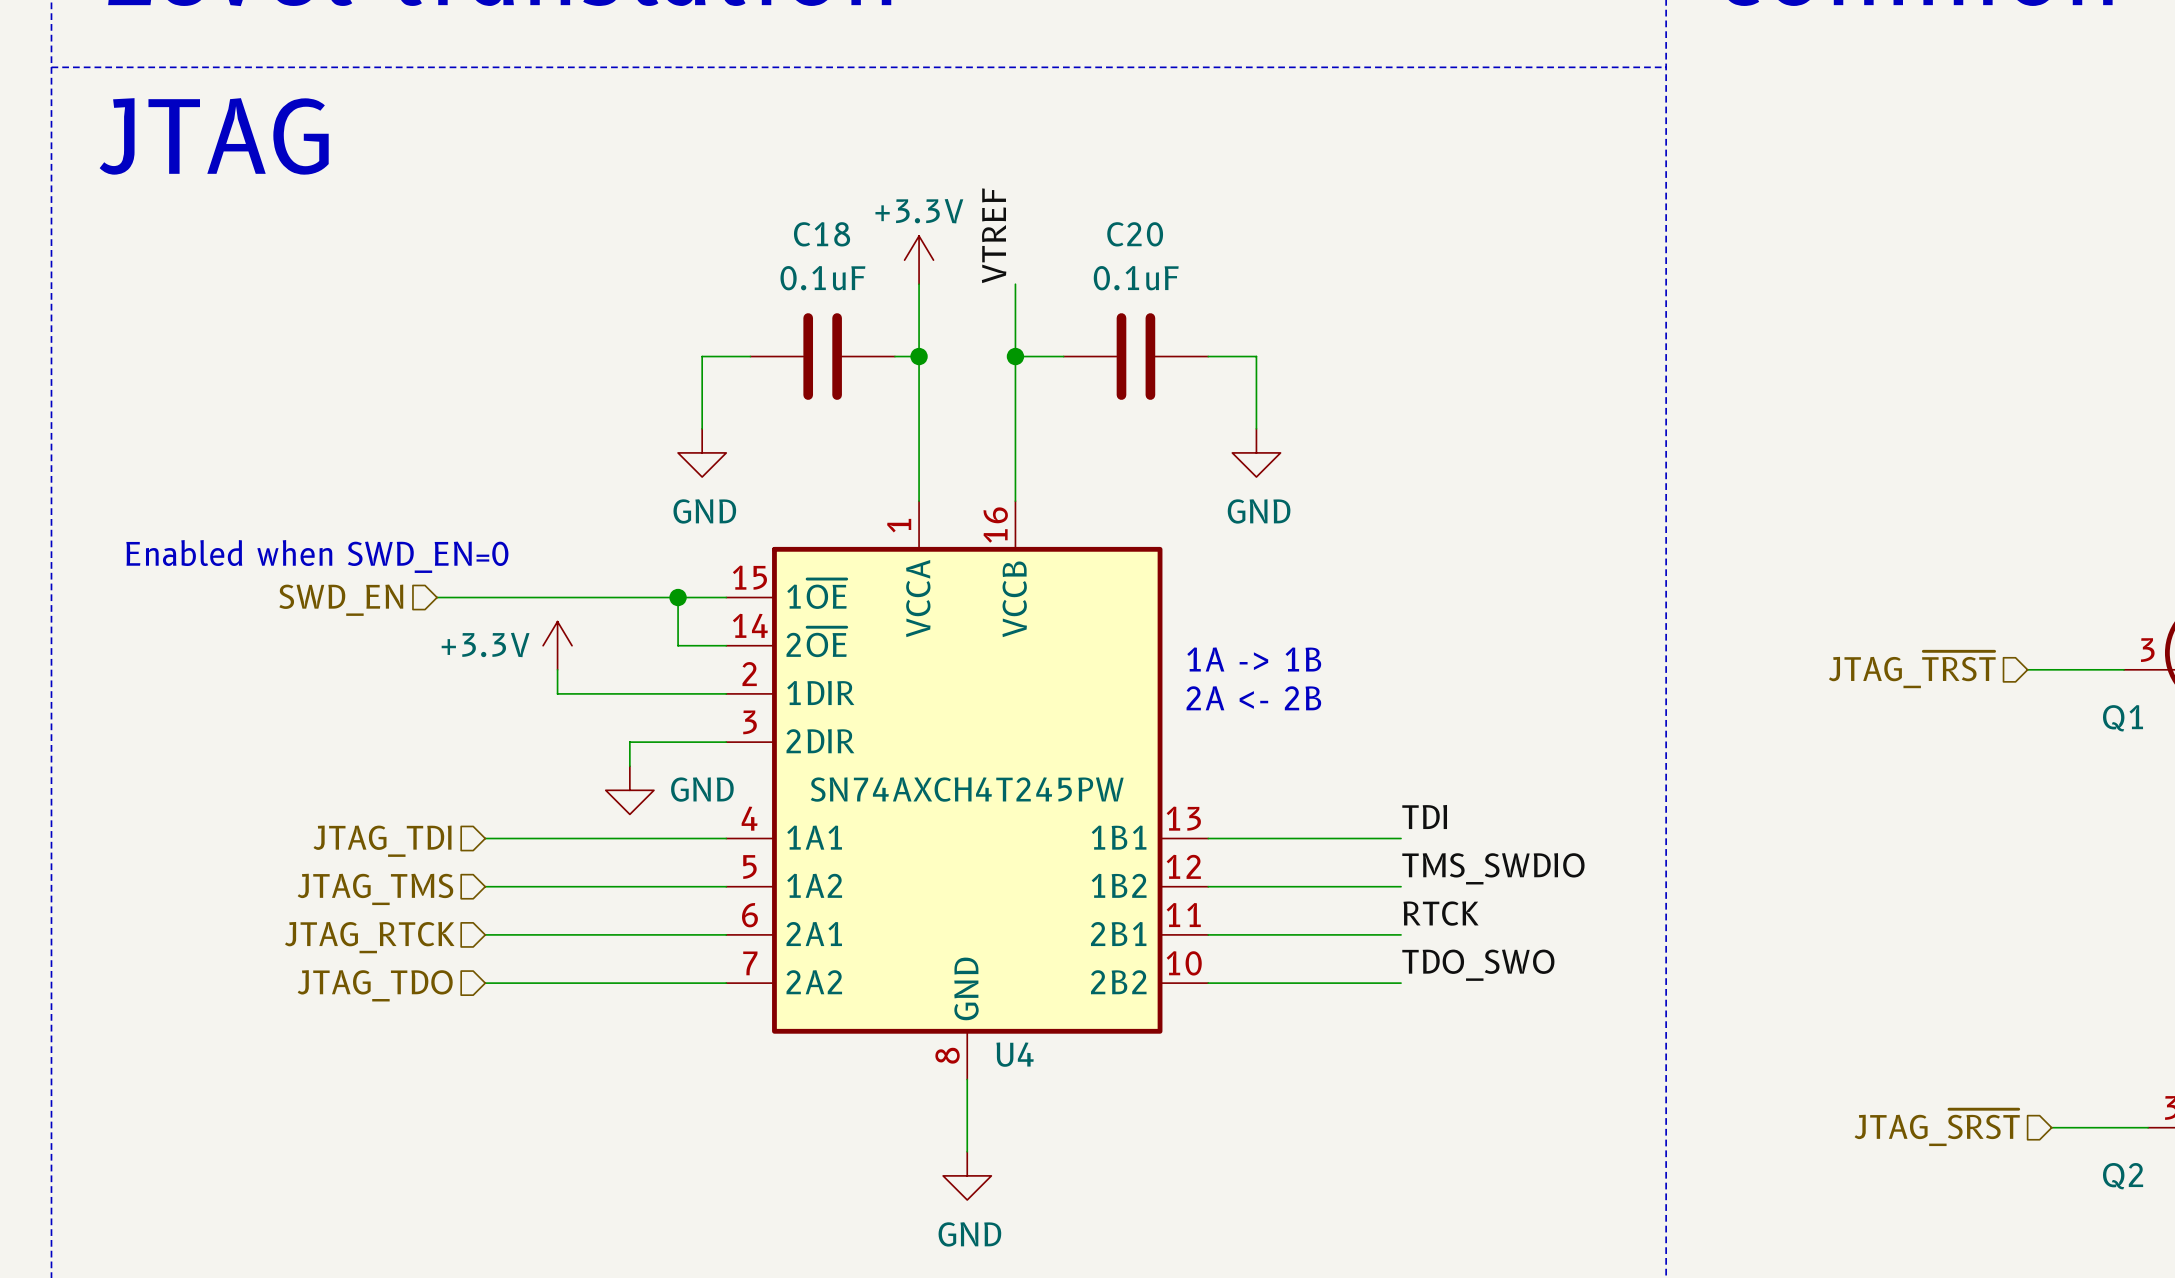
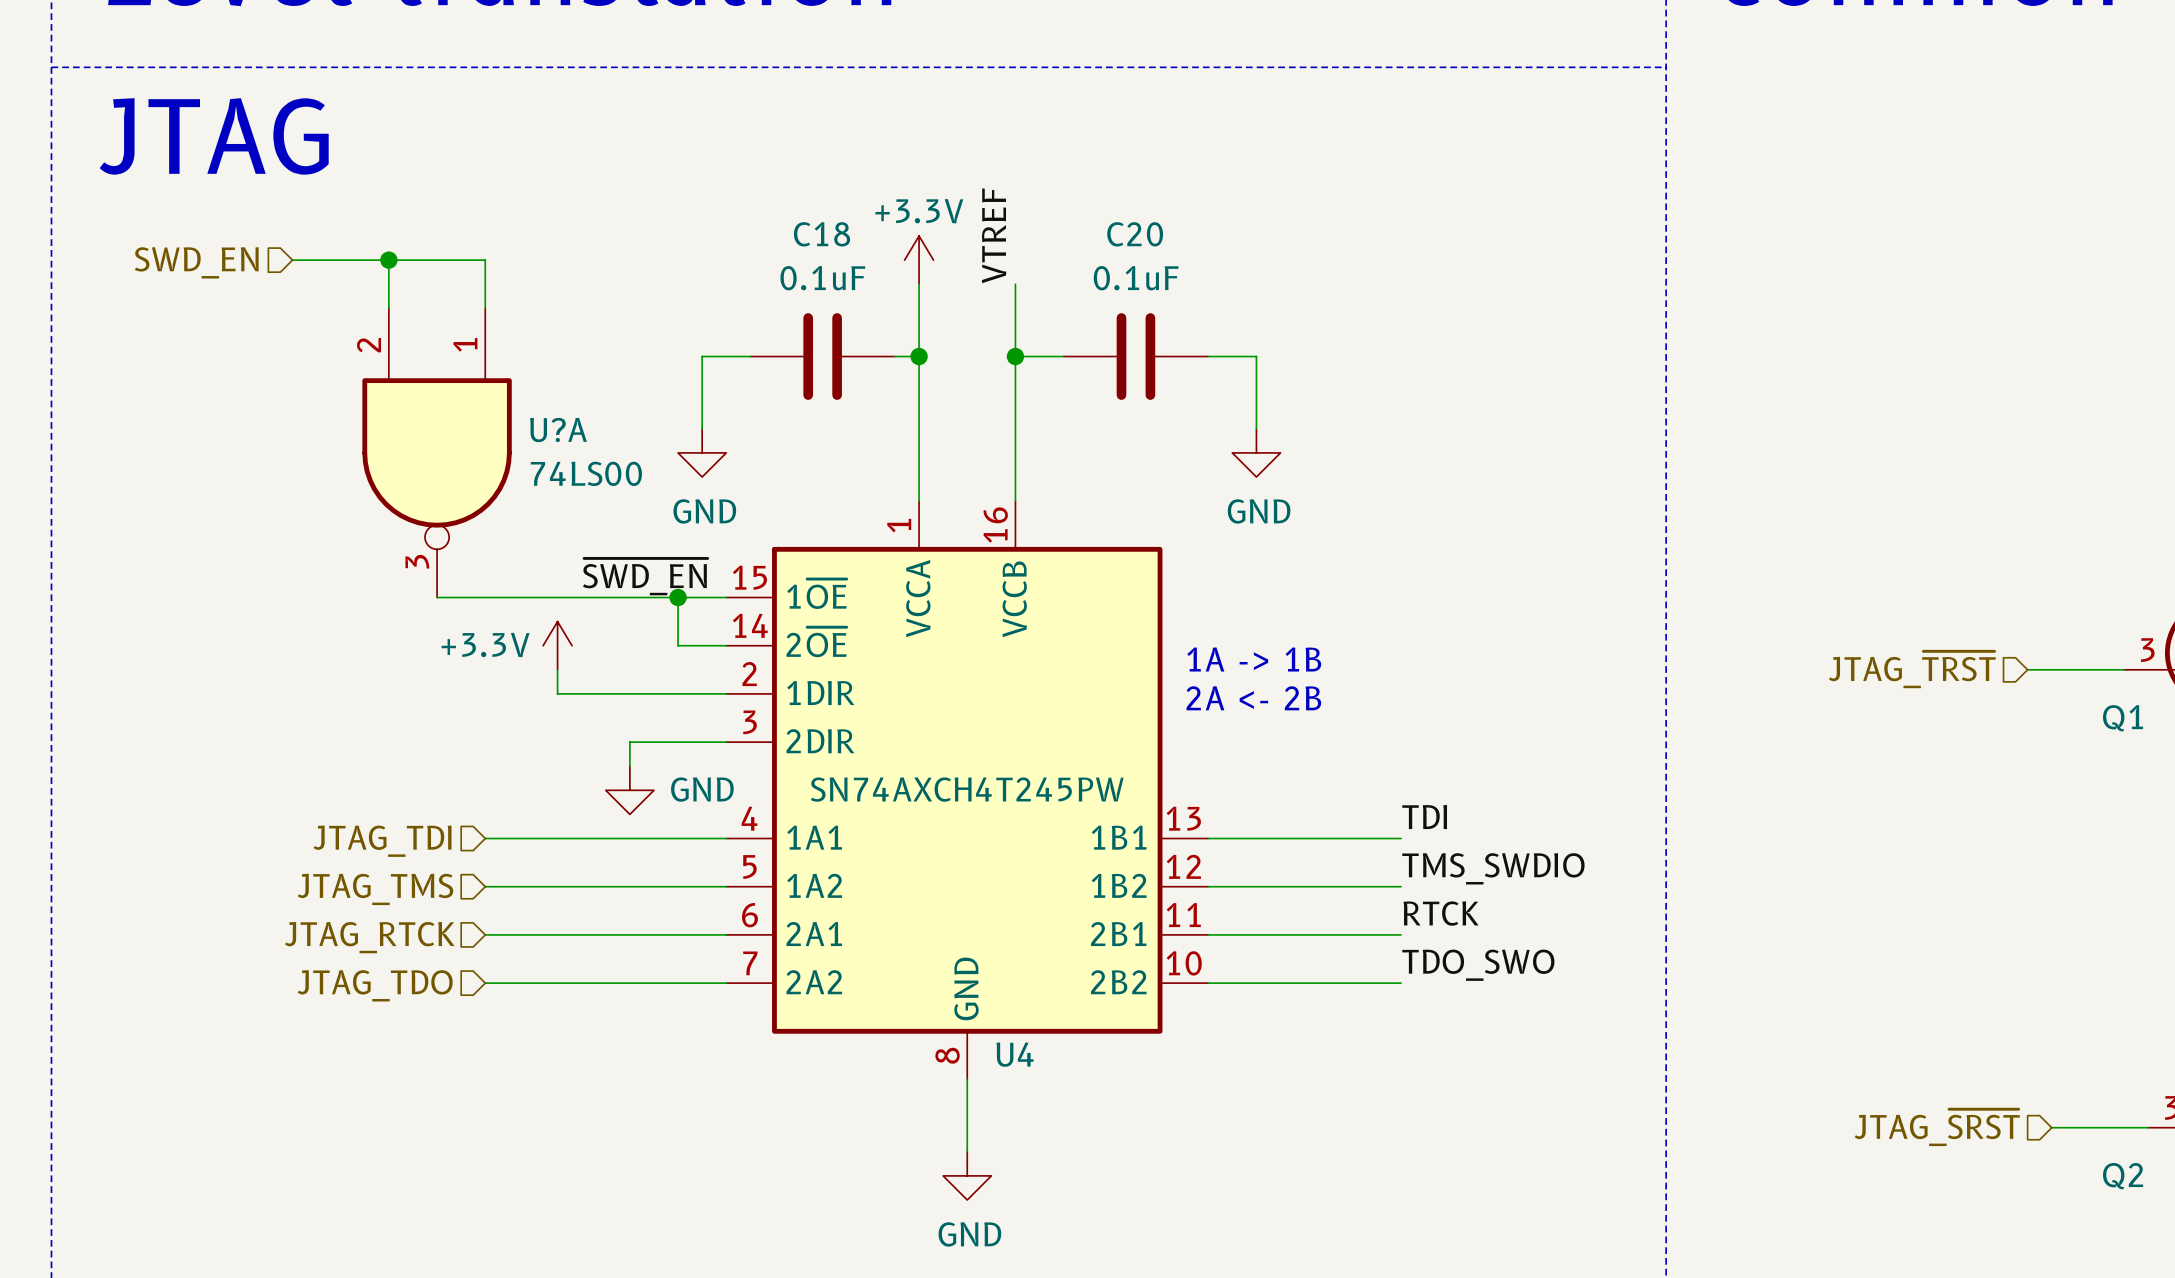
wire: none -> (292, 260) (485, 260) (485, 308)
wire: none -> (388, 260) (388, 308)
junction: none -> (388, 260)
U?A: none -> 74LS00 (437, 452)
text: Enabled when SWD_EN=0 (317, 556) -> none
label: none -> ~{SWD_EN} (645, 576)
hierarchical label position: SWD_EN (341, 600) -> SWD_EN (196, 262)

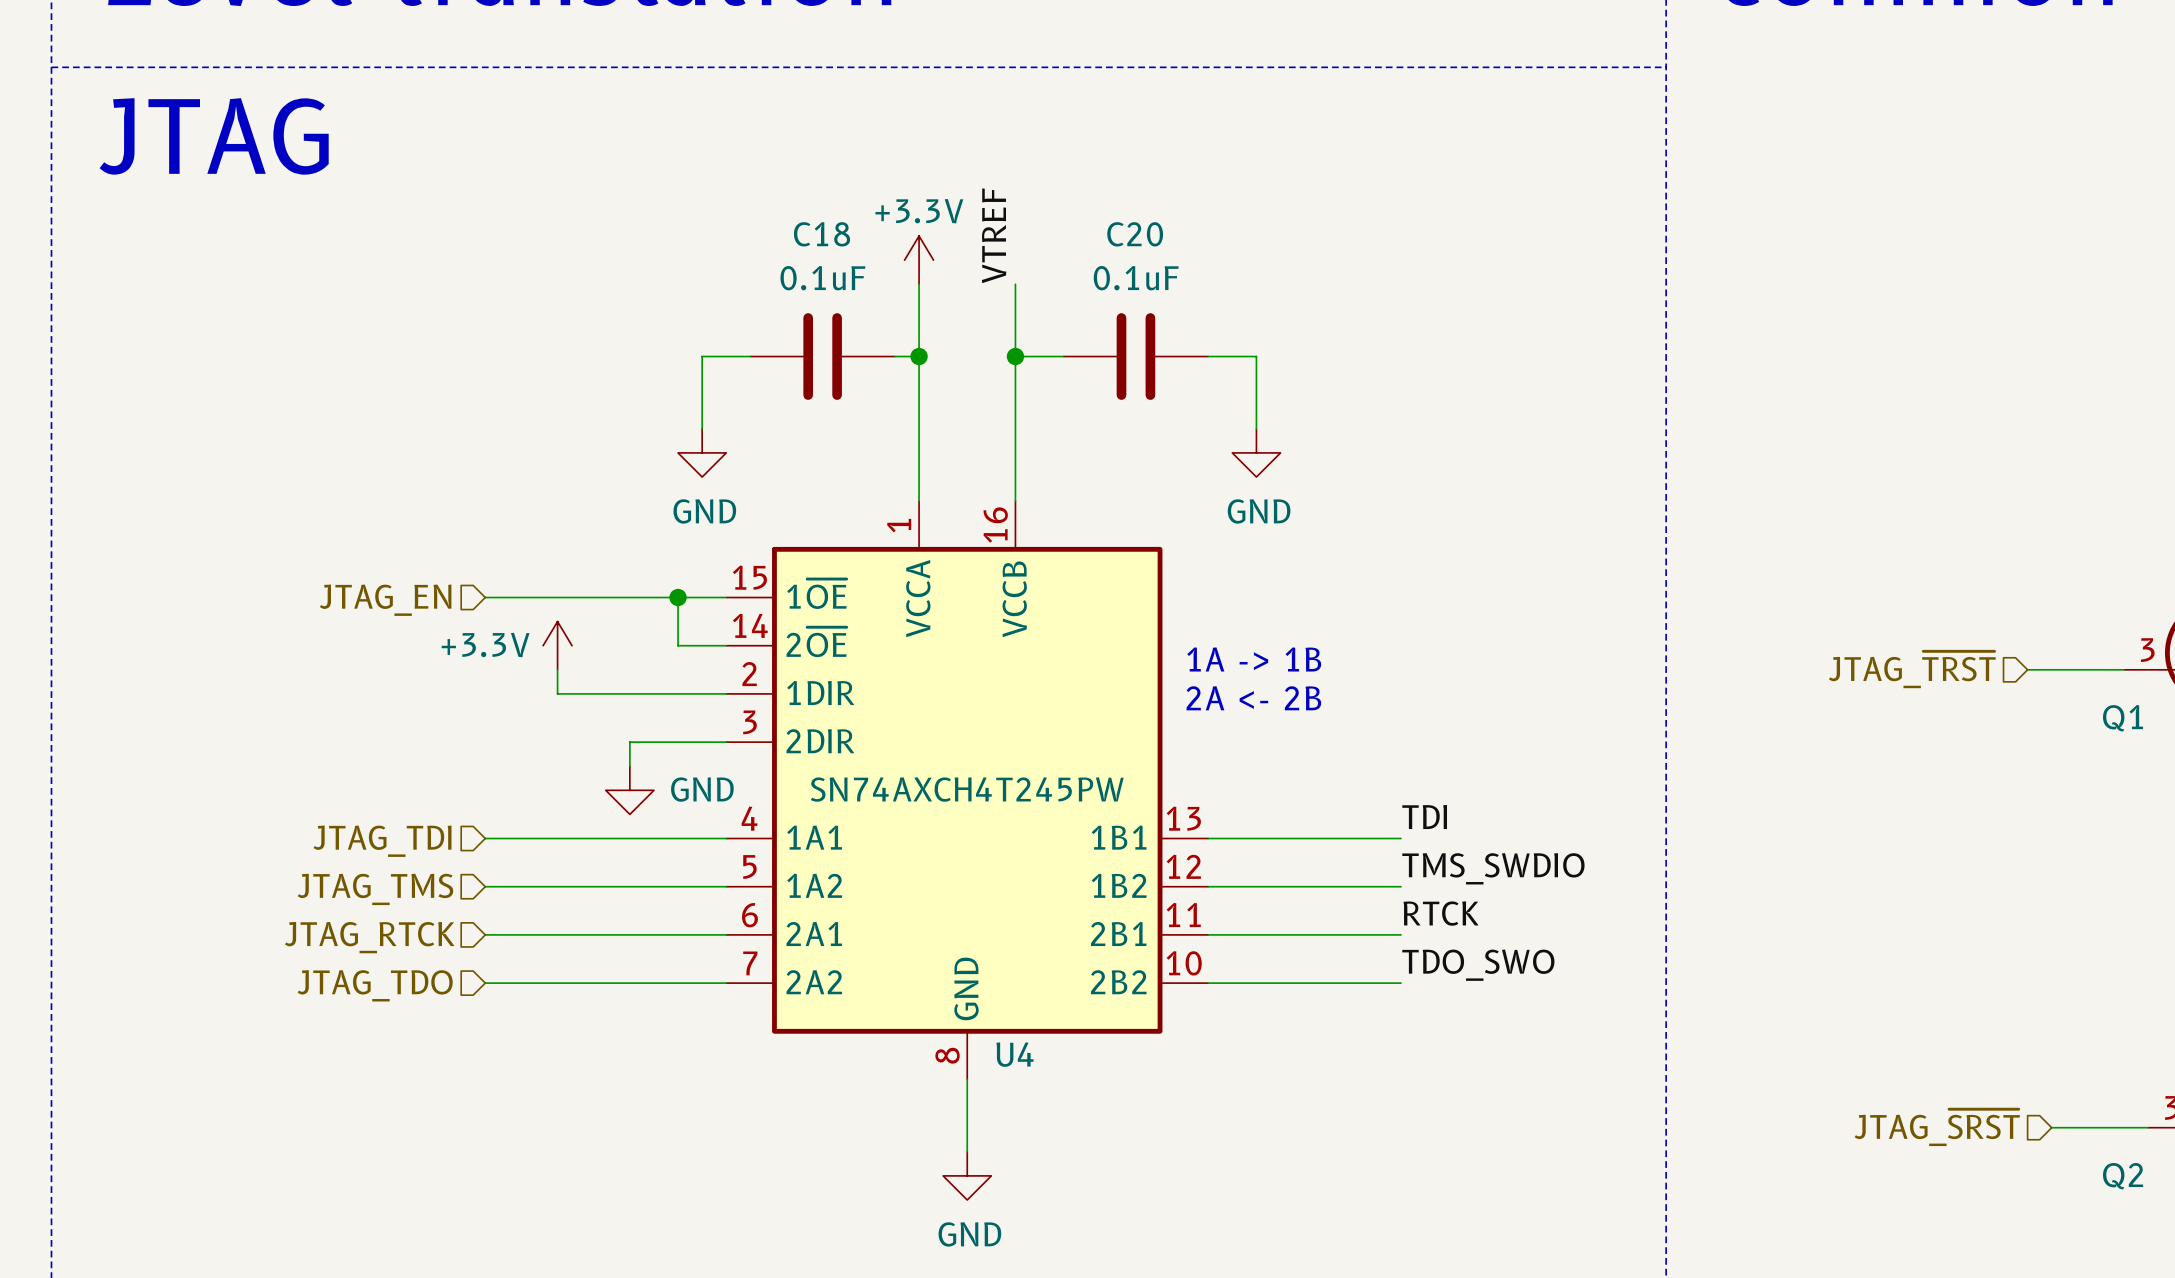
wire: (292, 260) (485, 260) (485, 308) -> none
wire: (388, 260) (388, 308) -> none
junction: (388, 260) -> none
hierarchical label: SWD_EN (196, 262) -> none
U?A: 74LS00 (437, 452) -> none
label: ~{SWD_EN} (645, 576) -> none
wire: (437, 597) (485, 597) -> none
hierarchical label: none -> JTAG_EN (385, 600)

